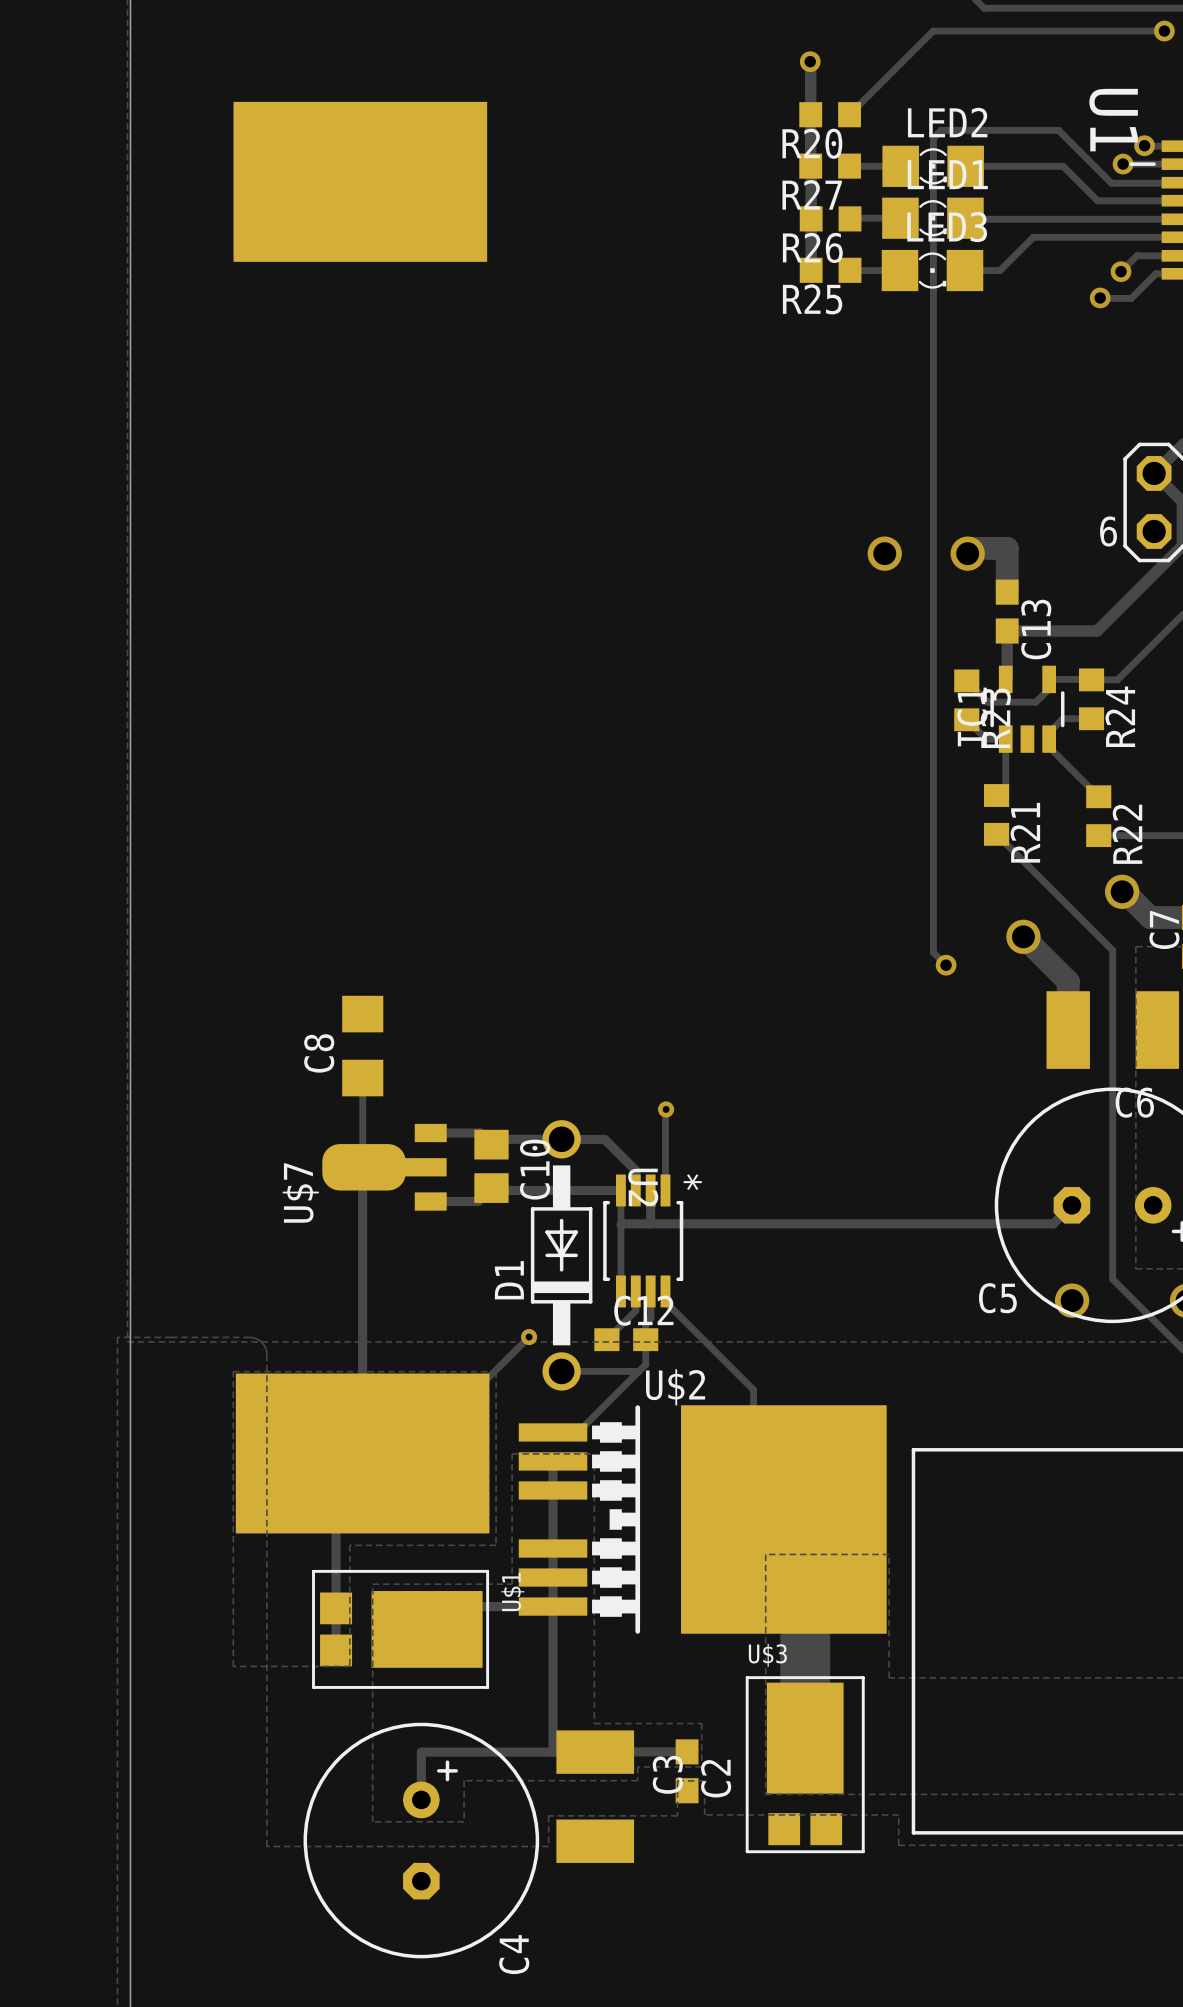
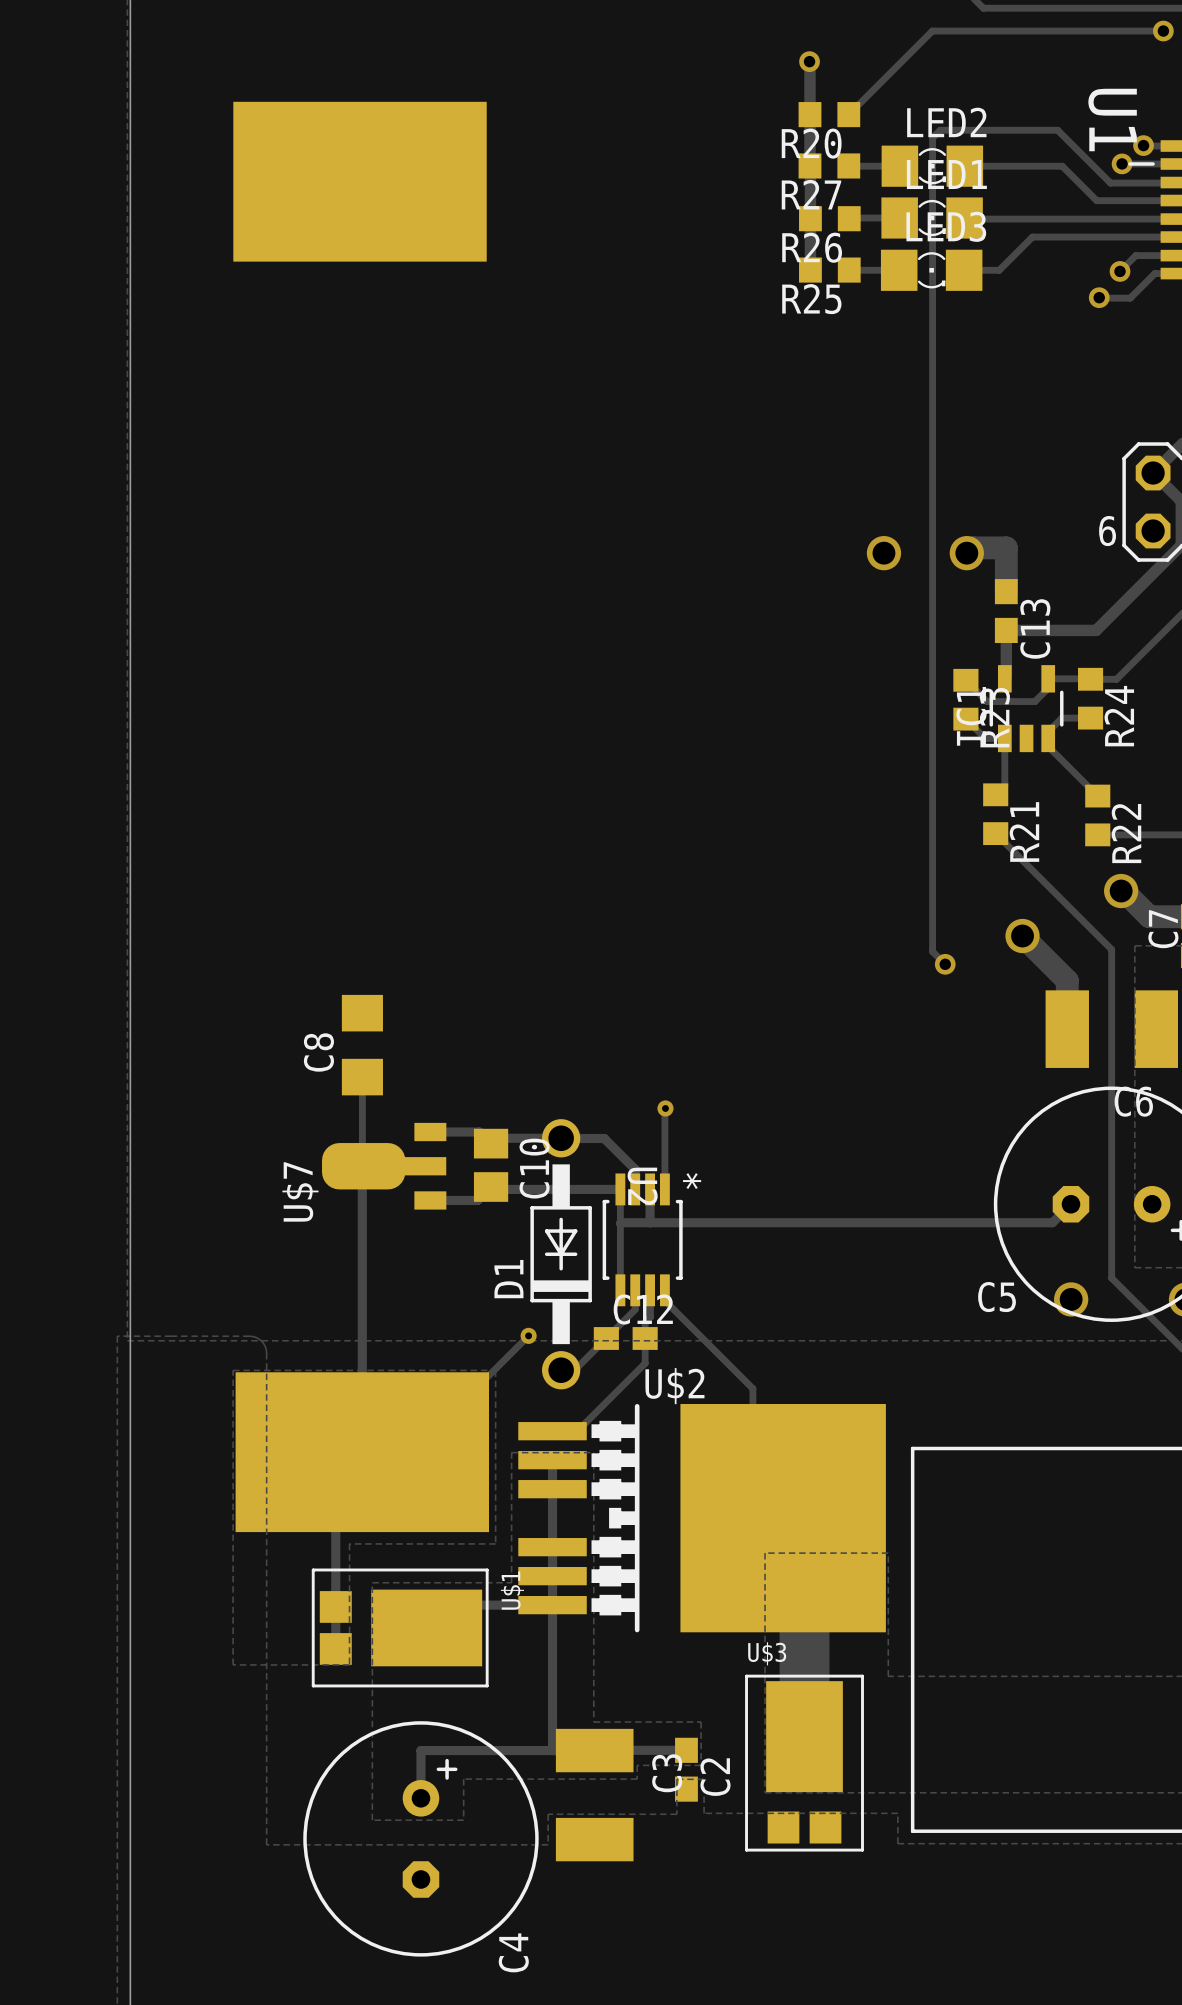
track: (575, 1371) (638, 1371) -> (574, 1370) (606, 1338)

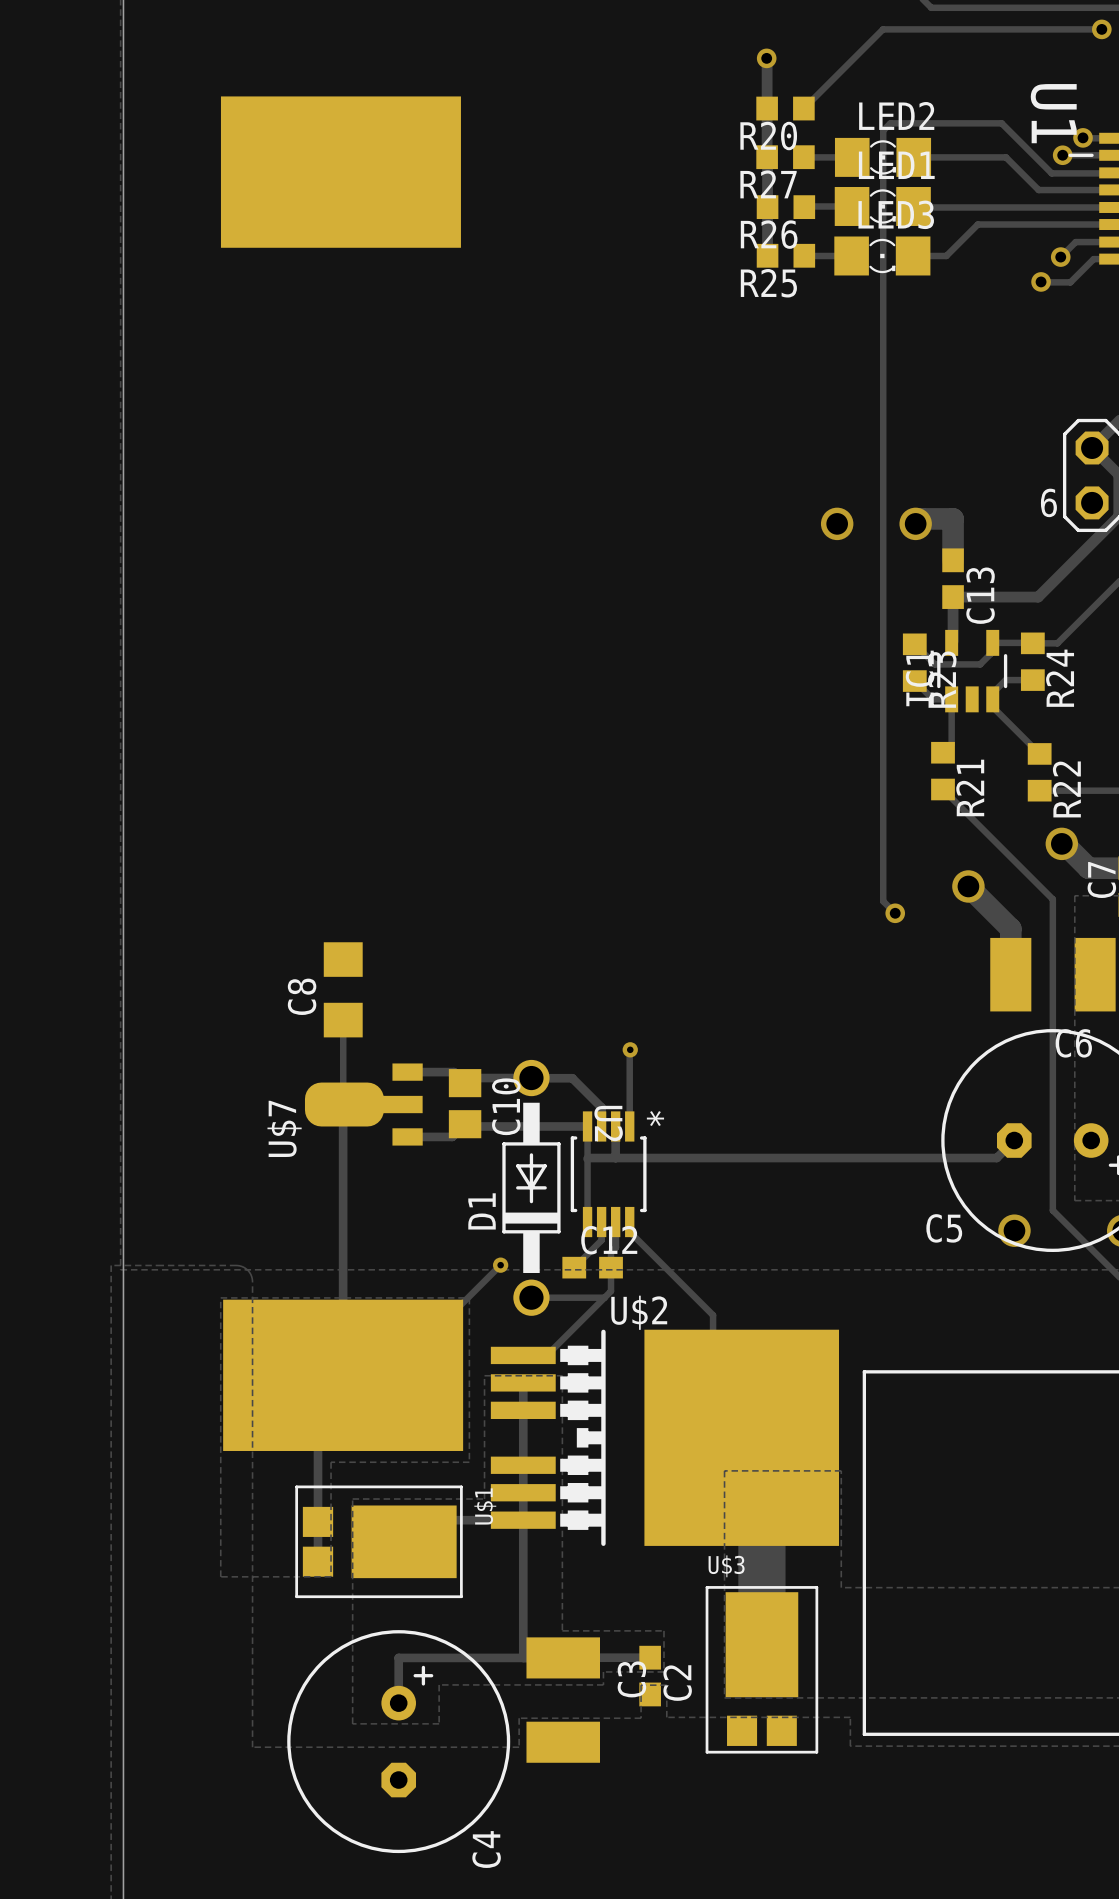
track: (606, 1338) (574, 1370) -> (604, 1297) (544, 1297)

